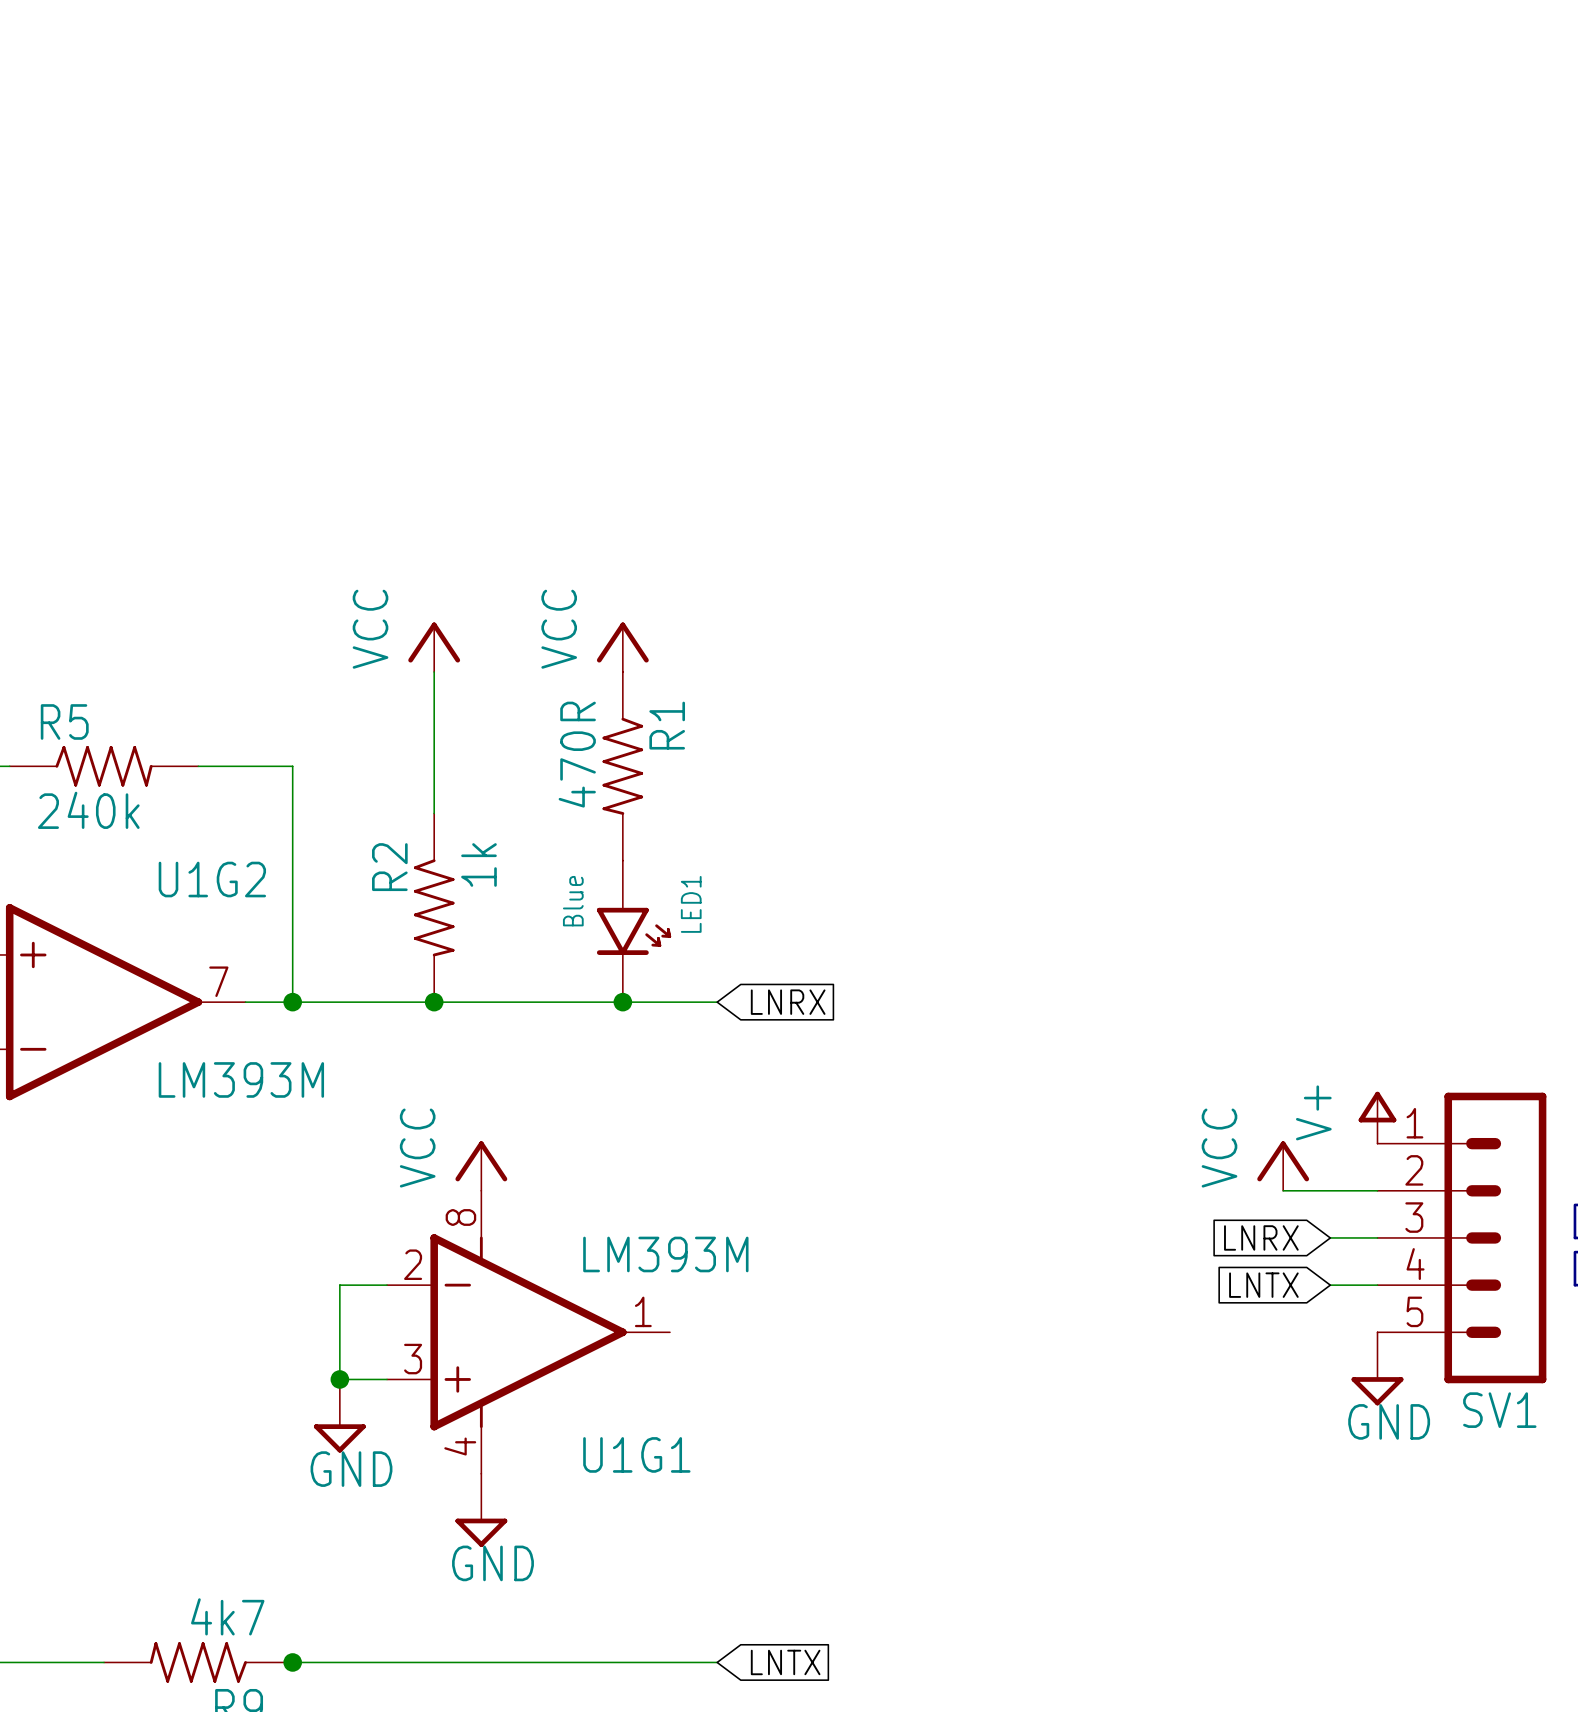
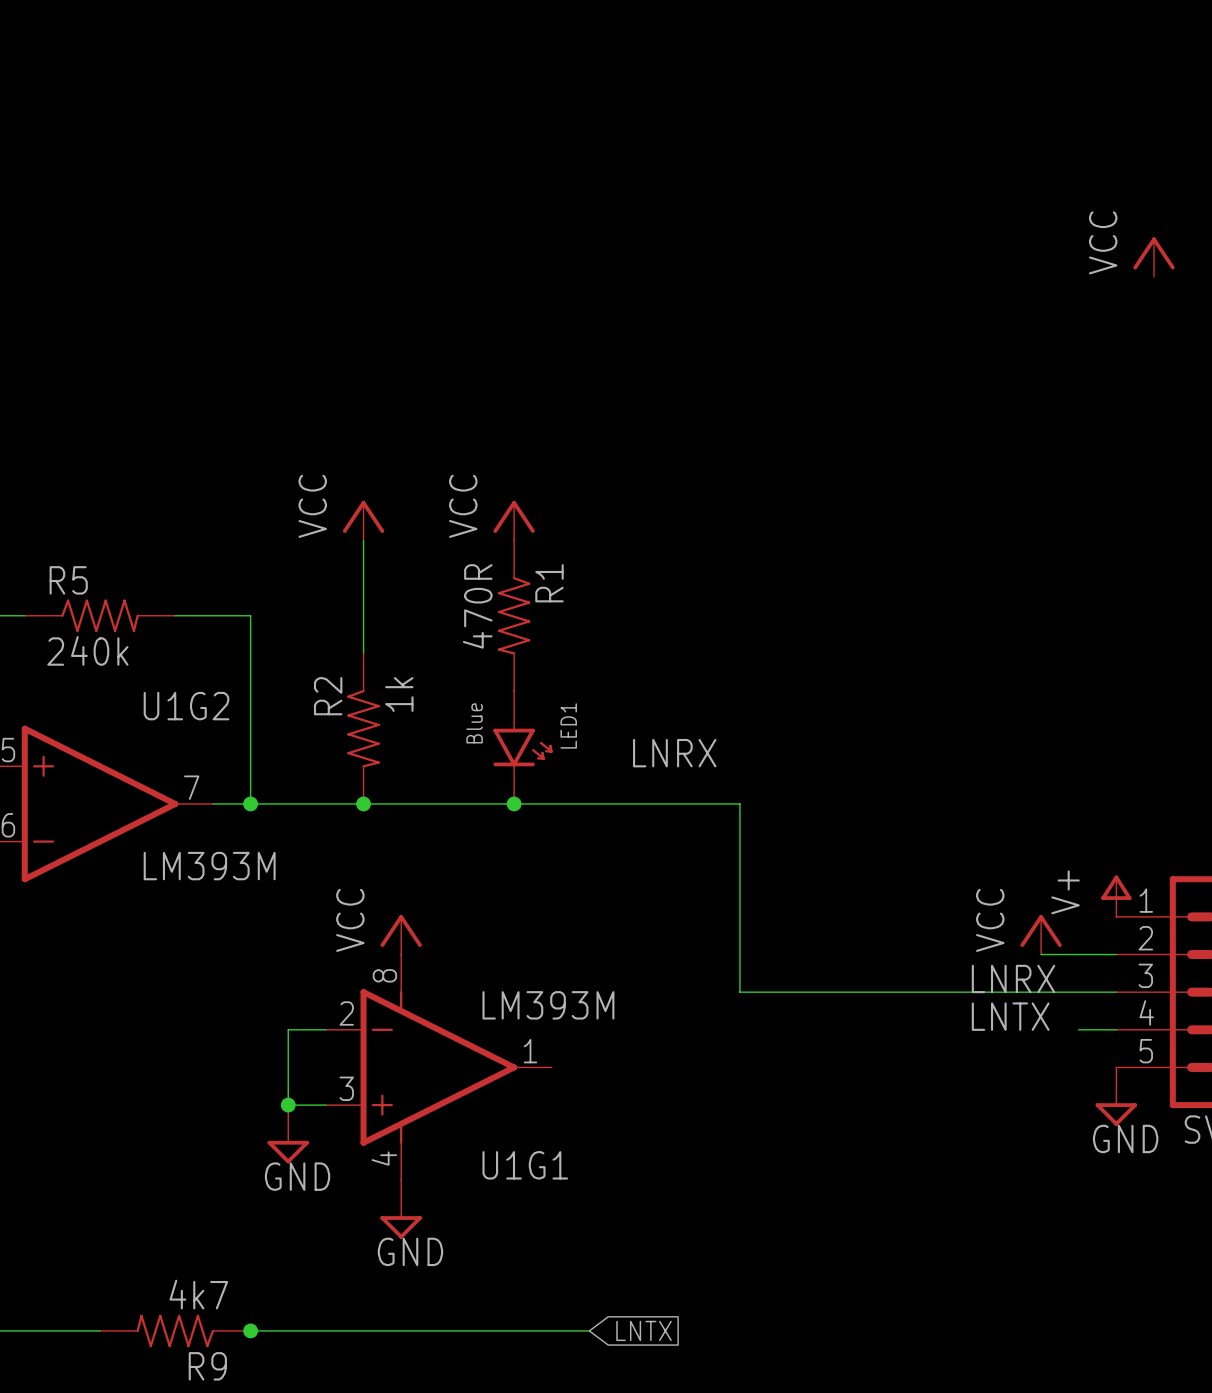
power symbol: none -> VCC (1154, 257)
label: none -> LNRX (674, 753)
wire: none -> (589, 803) (739, 803) (739, 992) (1078, 992)
global label: LNRX (788, 1002) -> none
label: none -> LNRX (1013, 978)
global label: LNRX (1261, 1237) -> none
label: none -> LNTX (1010, 1016)
global label: LNTX (1263, 1285) -> none

